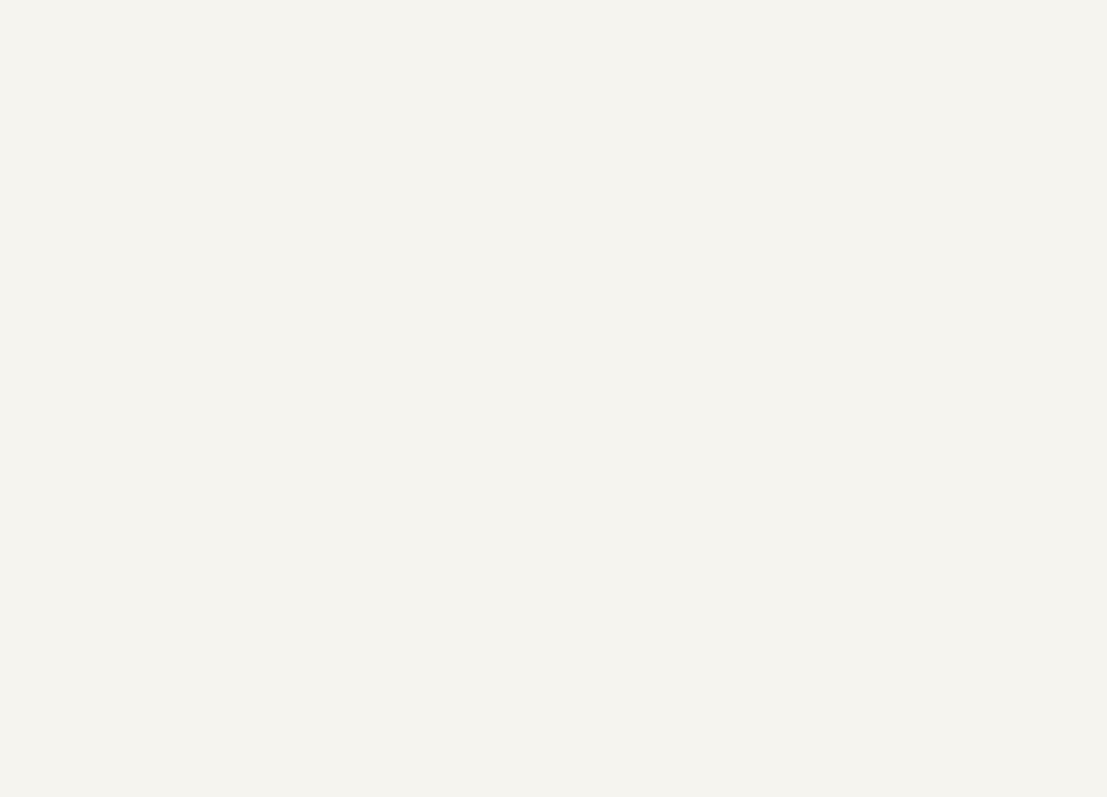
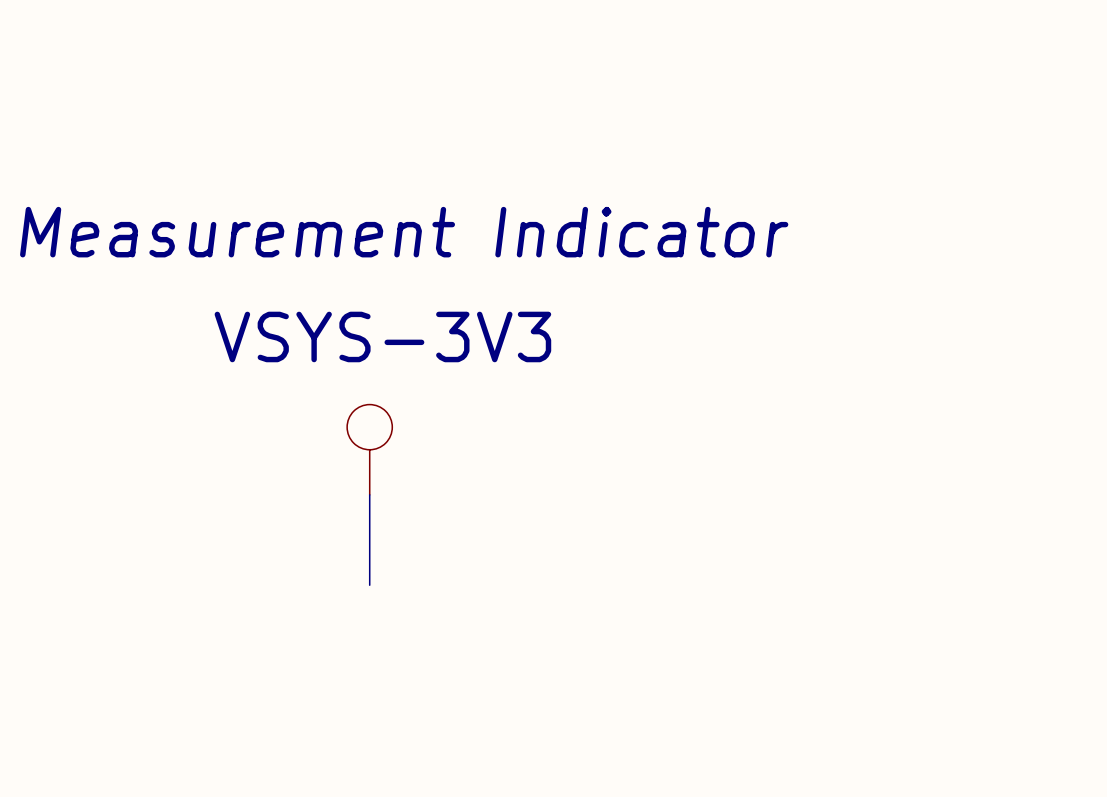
text: none -> Measurement Indicator (404, 232)
power symbol: none -> VSYS-3V3 (369, 449)
wire: none -> (369, 494) (369, 585)

